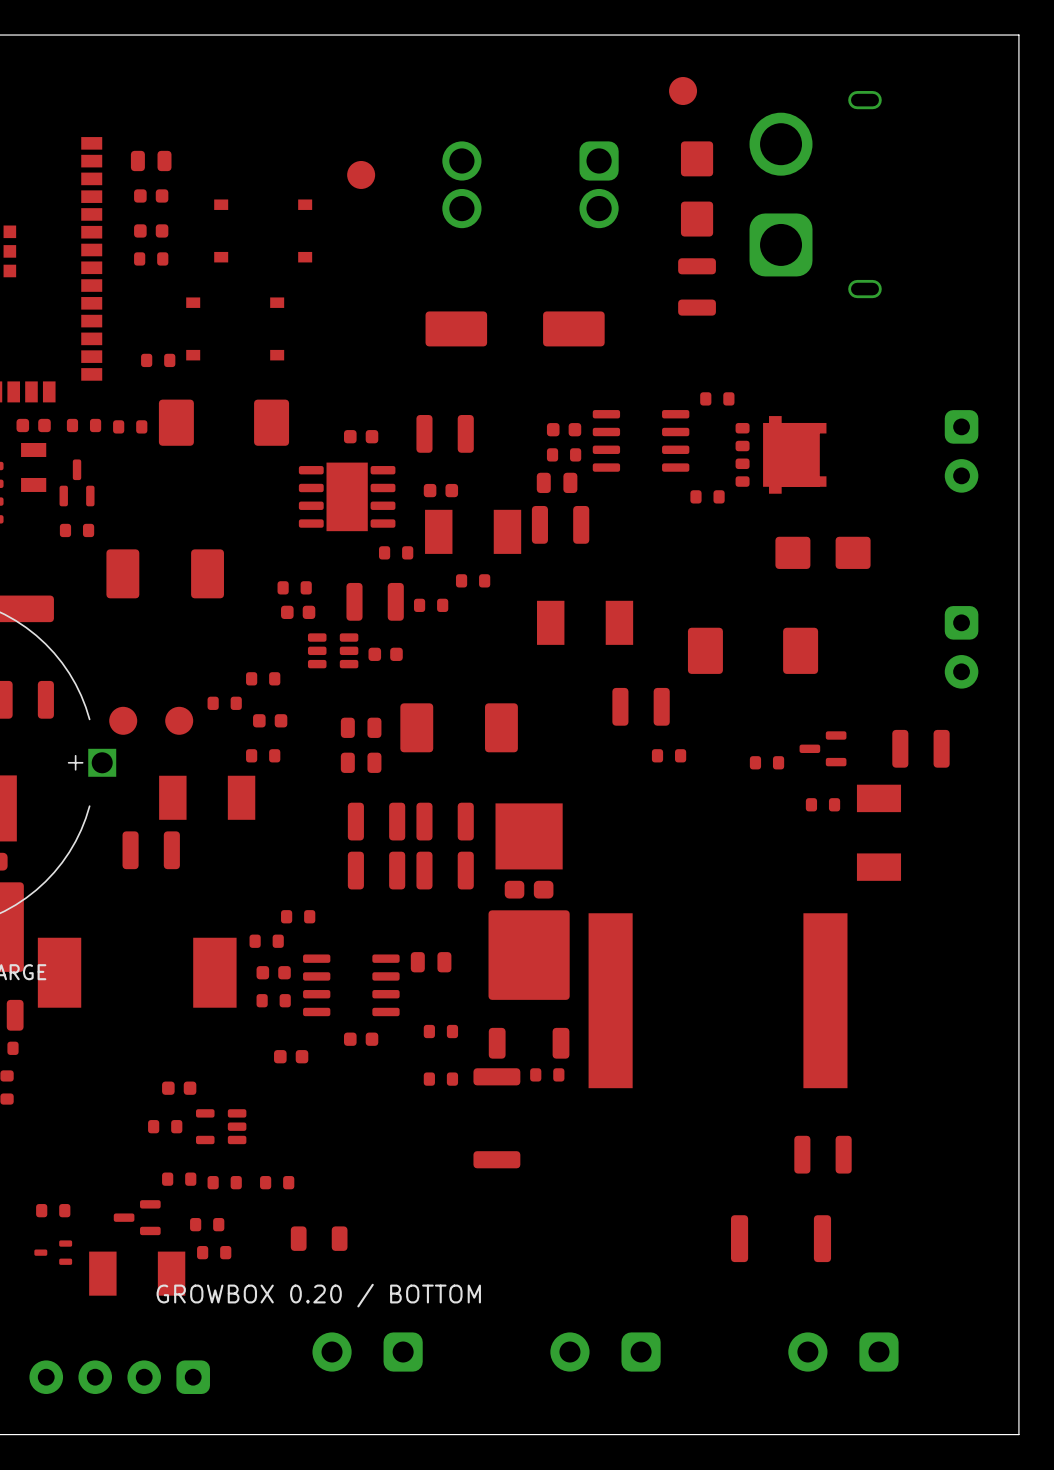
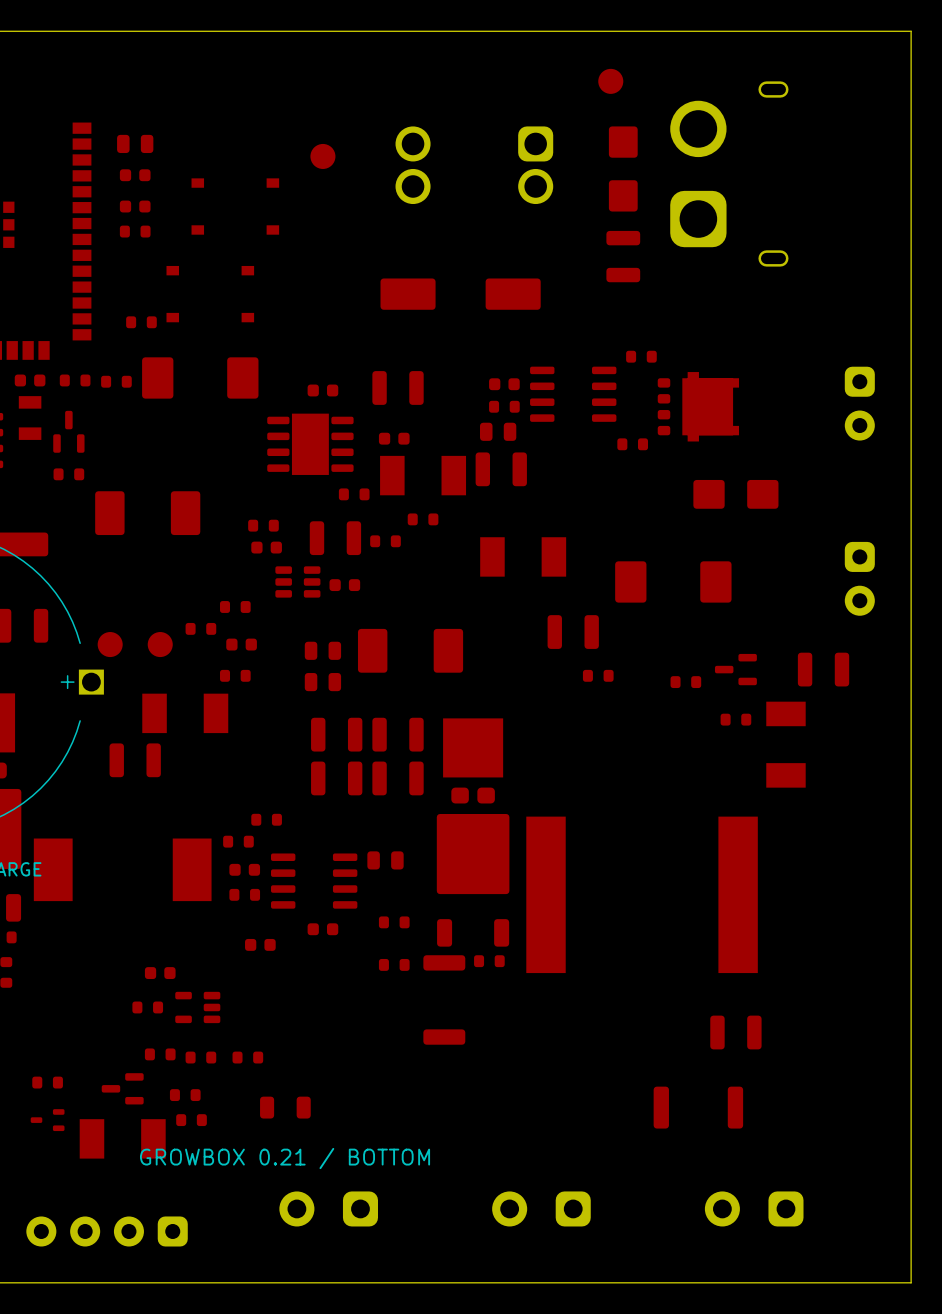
text: GROWBOX 0.20 / BOTTOM (318, 1295) -> GROWBOX 0.21 / BOTTOM (285, 1158)

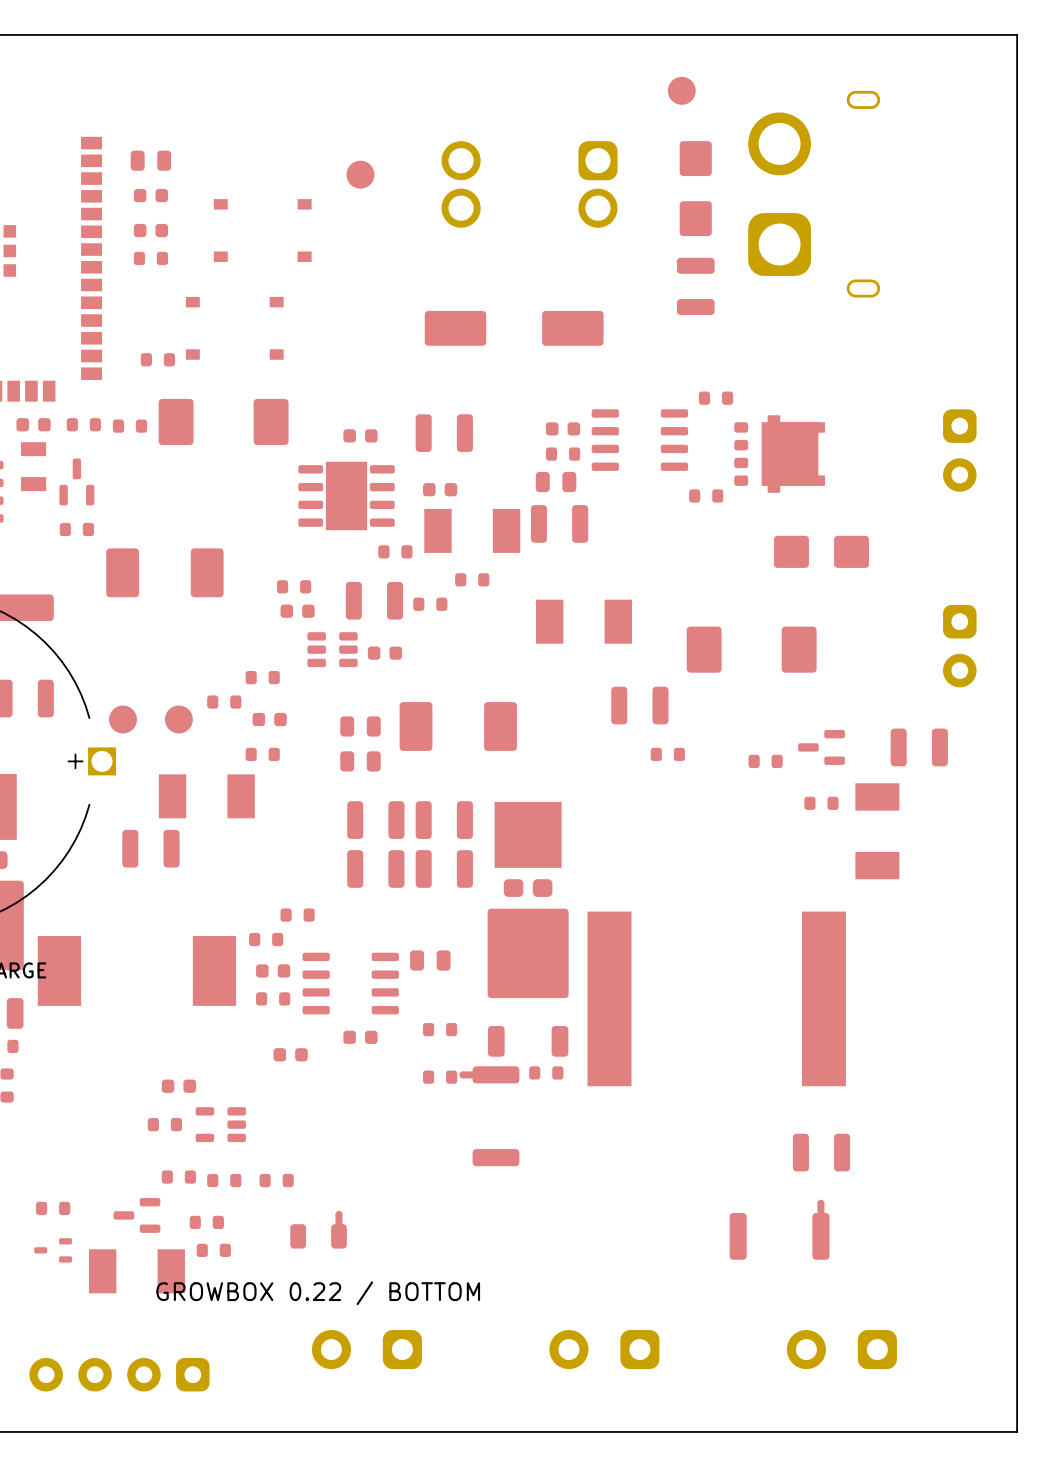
part: none -> (469, 1074)
part: none -> (820, 1210)
part: none -> (338, 1221)
text: GROWBOX 0.21 / BOTTOM (285, 1158) -> GROWBOX 0.22 / BOTTOM (318, 1293)

